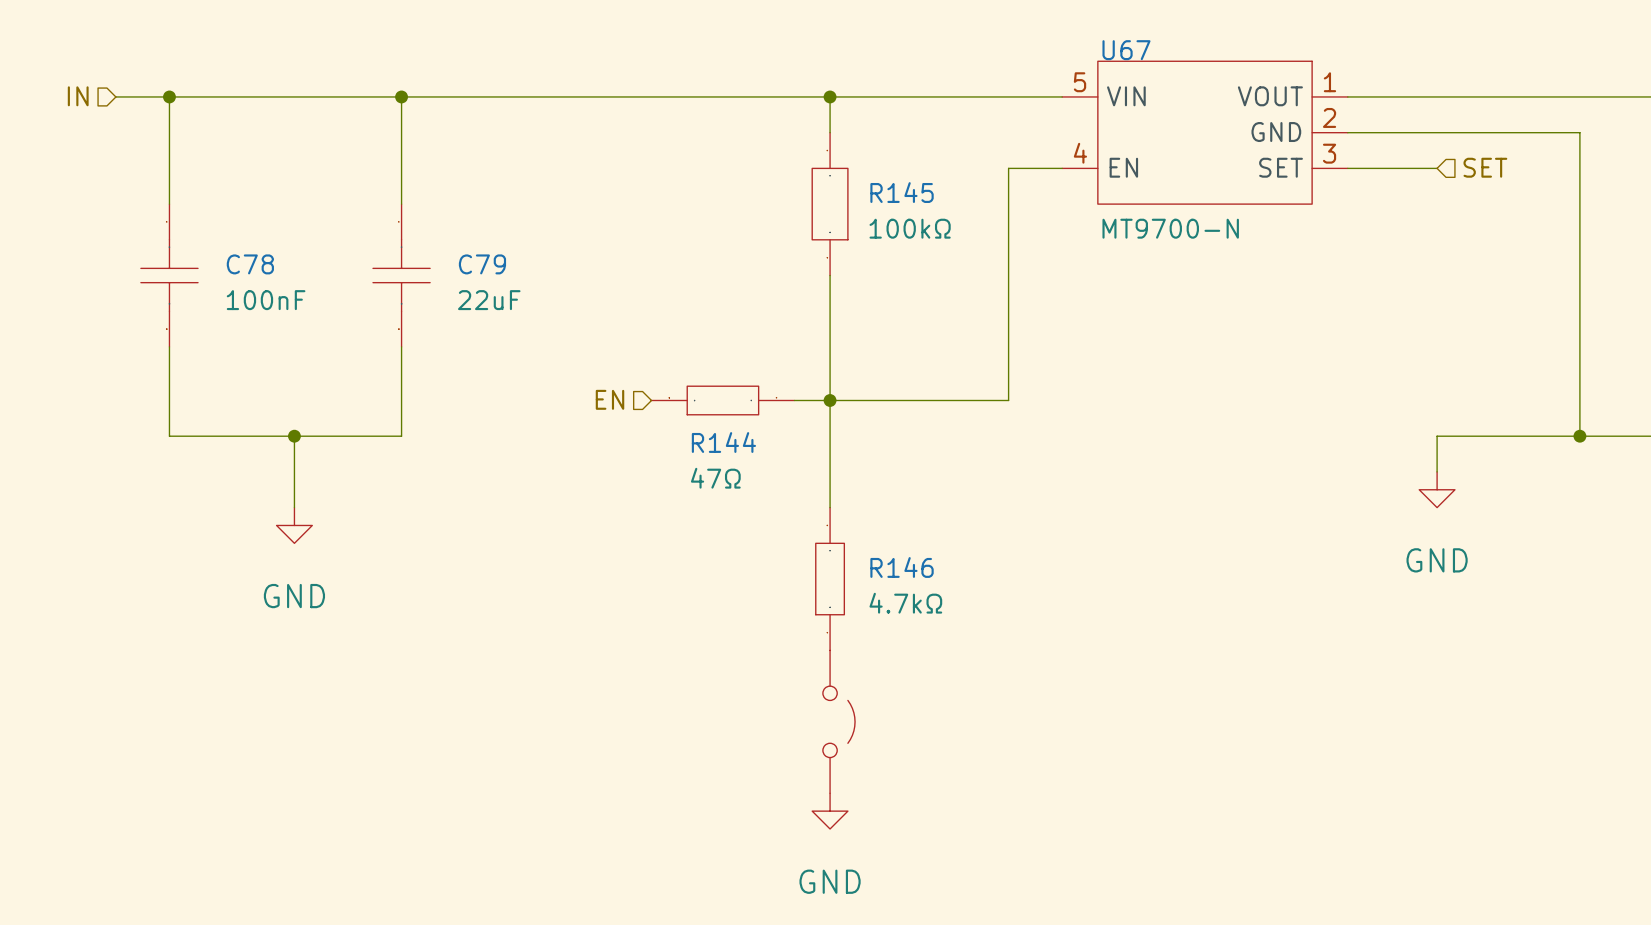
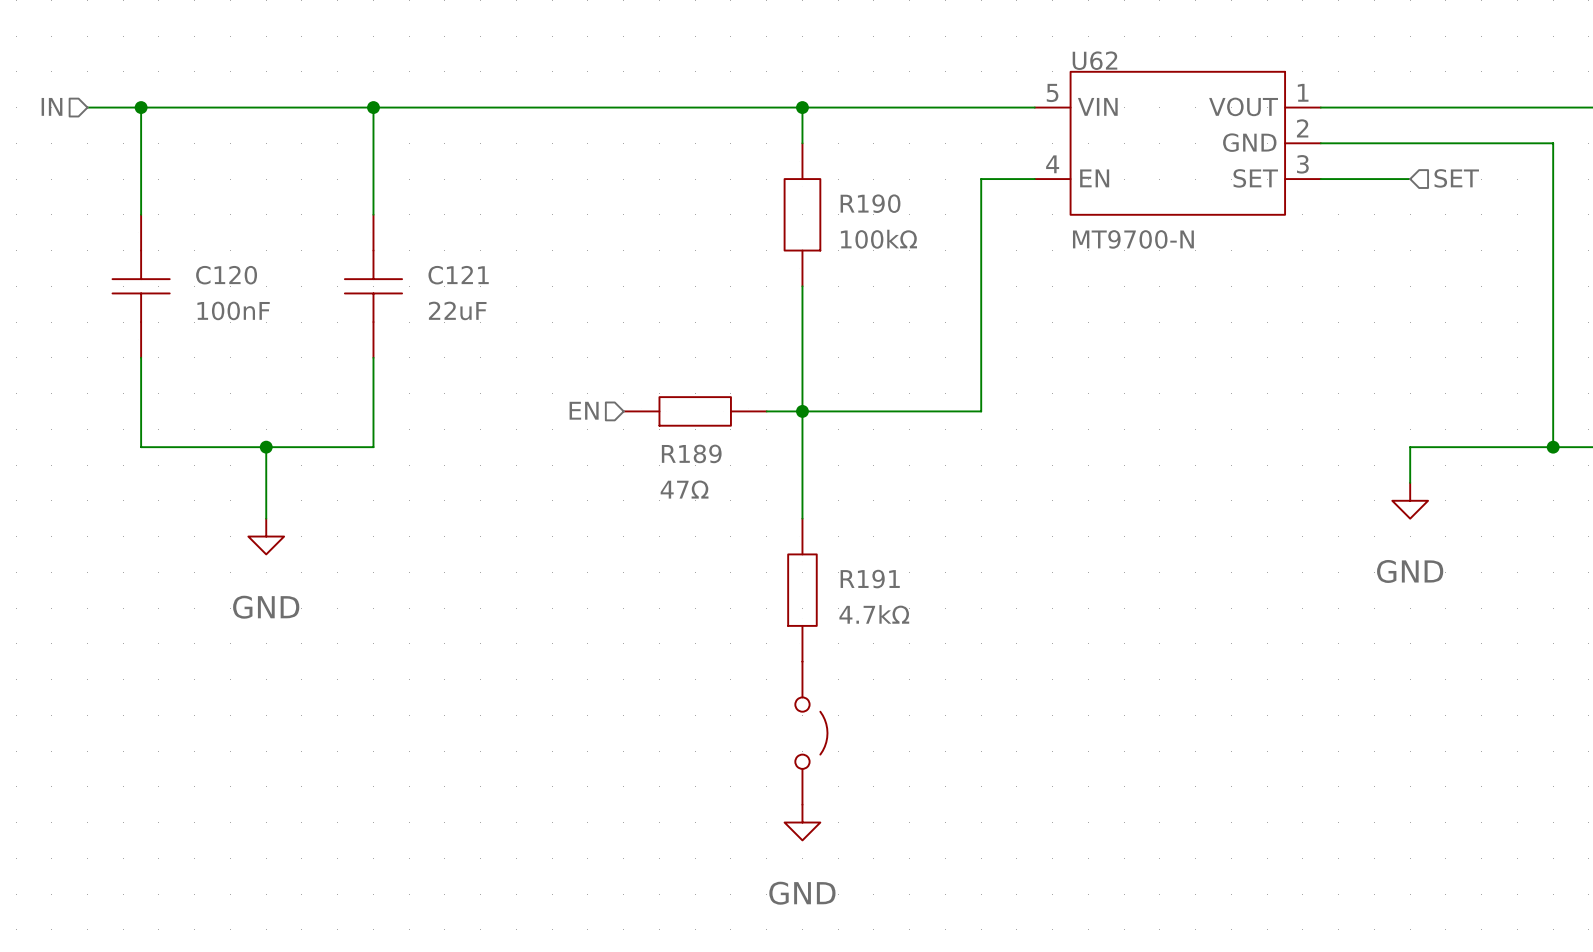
U67 name: U67 (1126, 50) -> U62 (1094, 60)
R145 name: R145 (902, 192) -> R190 (870, 203)
C78 name: C78 (250, 264) -> C120 (226, 275)
C79 name: C79 (482, 264) -> C121 (458, 275)
R144 name: R144 (723, 442) -> R189 (691, 453)
R146 name: R146 (902, 567) -> R191 (870, 579)

